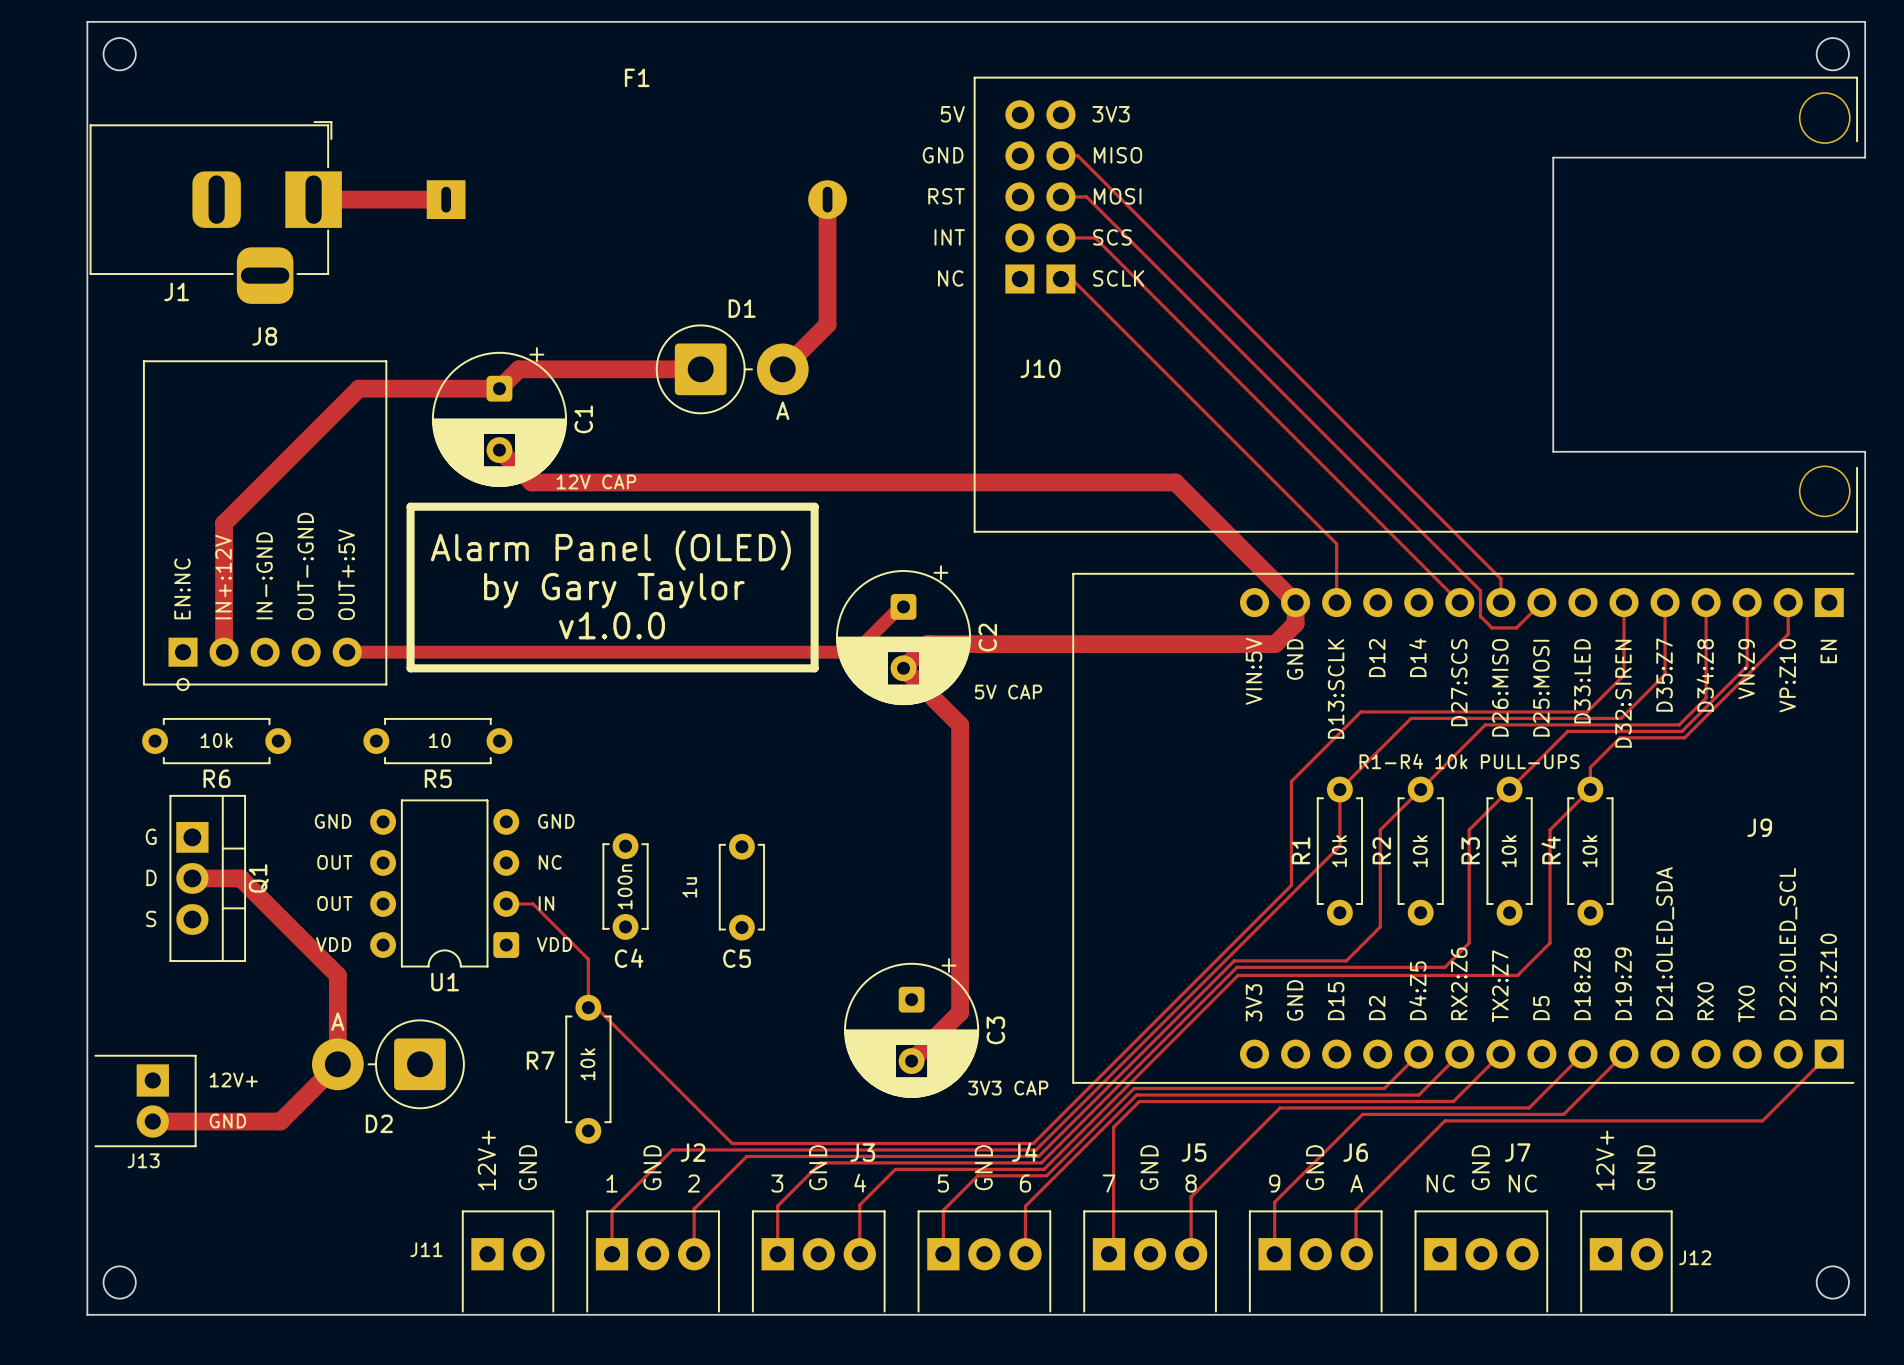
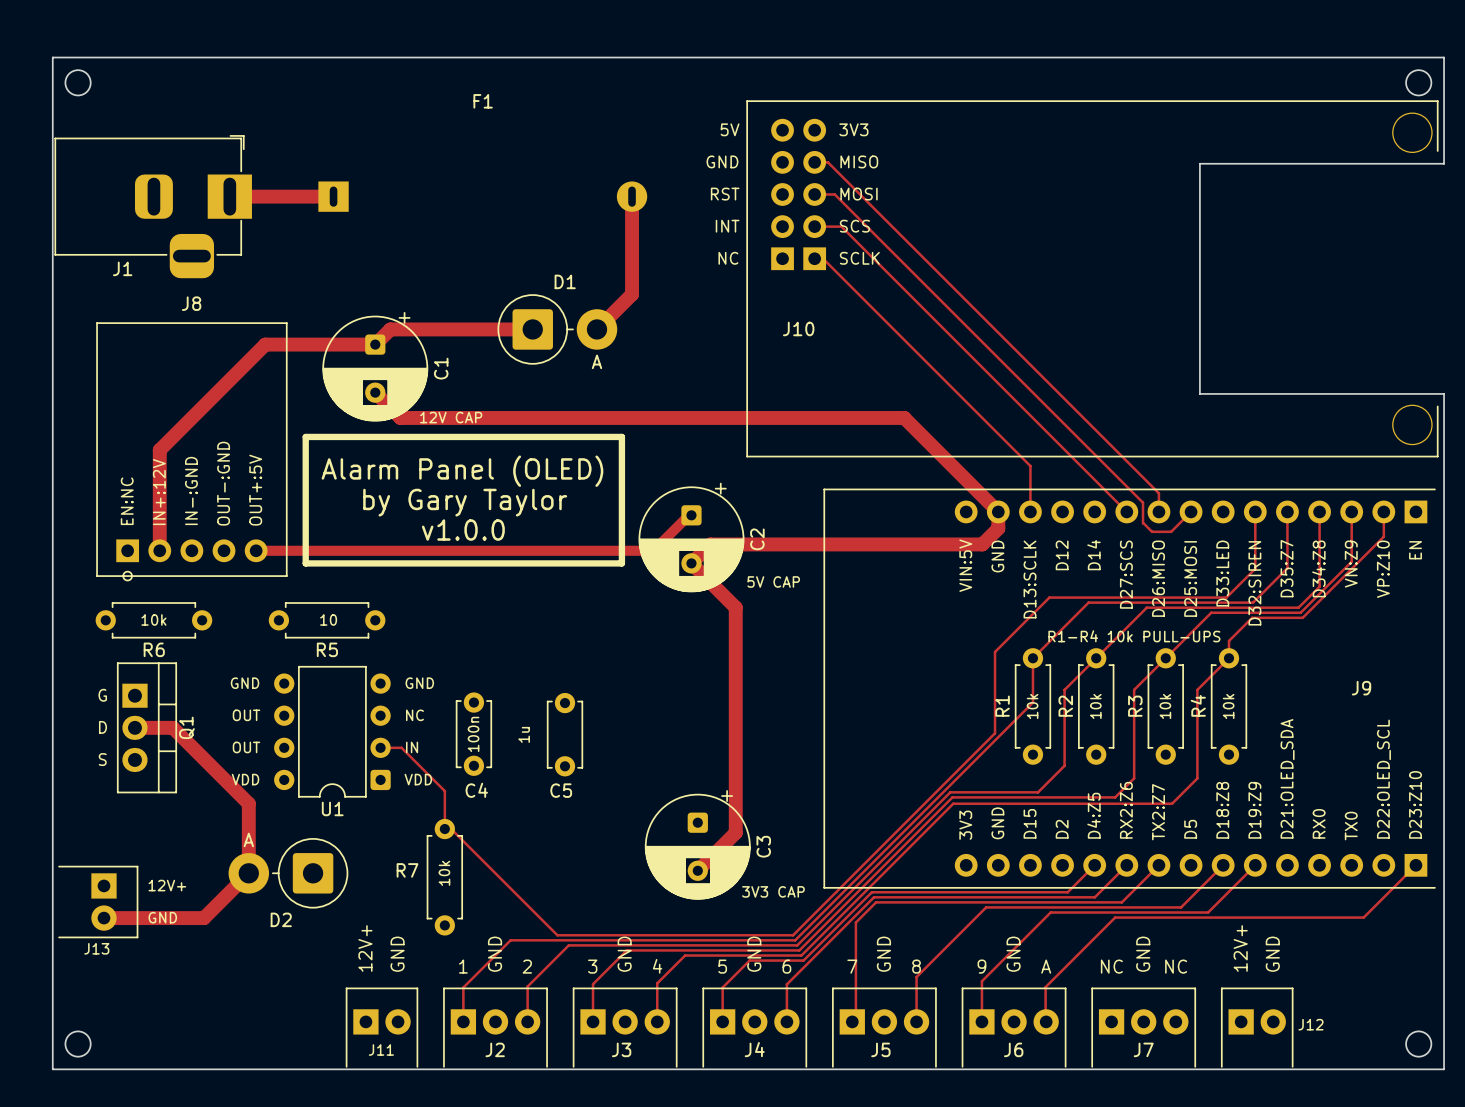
J2 name position: J2 (693, 1152) -> J2 (495, 1049)
J3 name position: J3 (862, 1152) -> J3 (621, 1049)
J4 name position: J4 (1024, 1152) -> J4 (754, 1049)
J5 name position: J5 (1194, 1152) -> J5 (880, 1049)
J6 name position: J6 (1355, 1152) -> J6 (1013, 1049)
J7 name position: J7 (1517, 1152) -> J7 (1143, 1049)
J11 name position: J11 (426, 1249) -> J11 (381, 1049)

